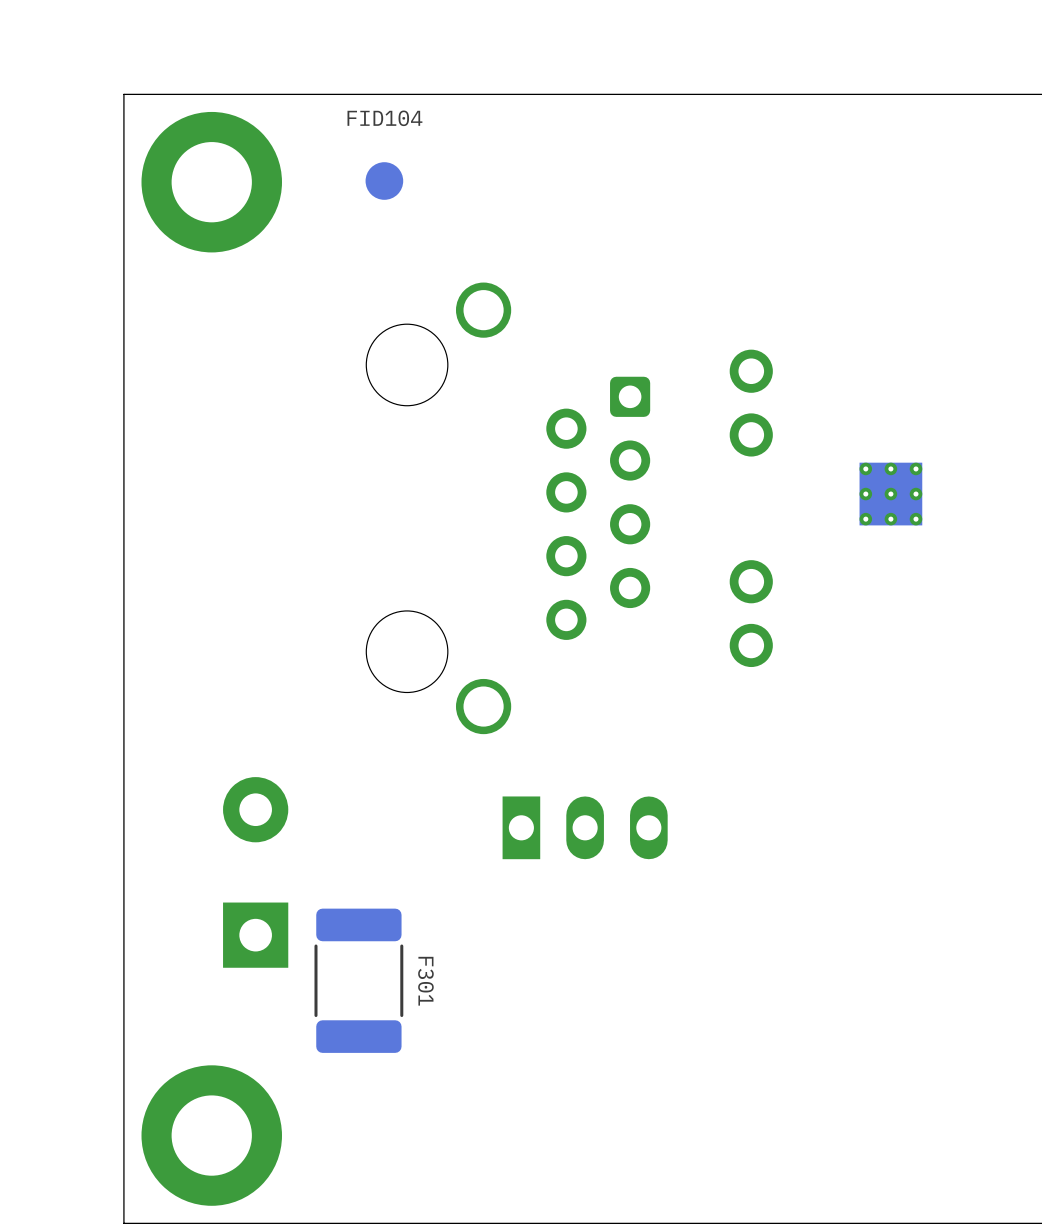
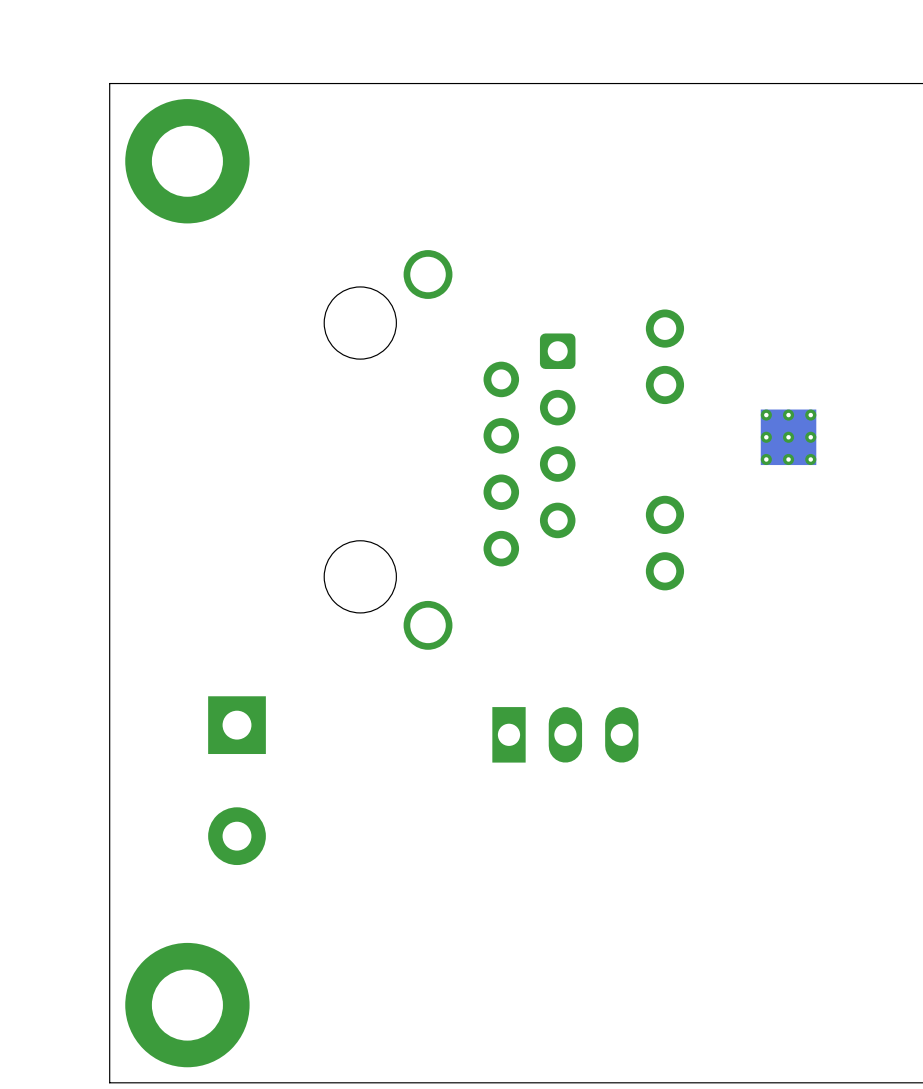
FID104: (384, 181) -> none
part position: (585, 827) -> (565, 734)
part rotation: 0° (255, 872) -> 180° (237, 780)
F301: (358, 980) -> none

